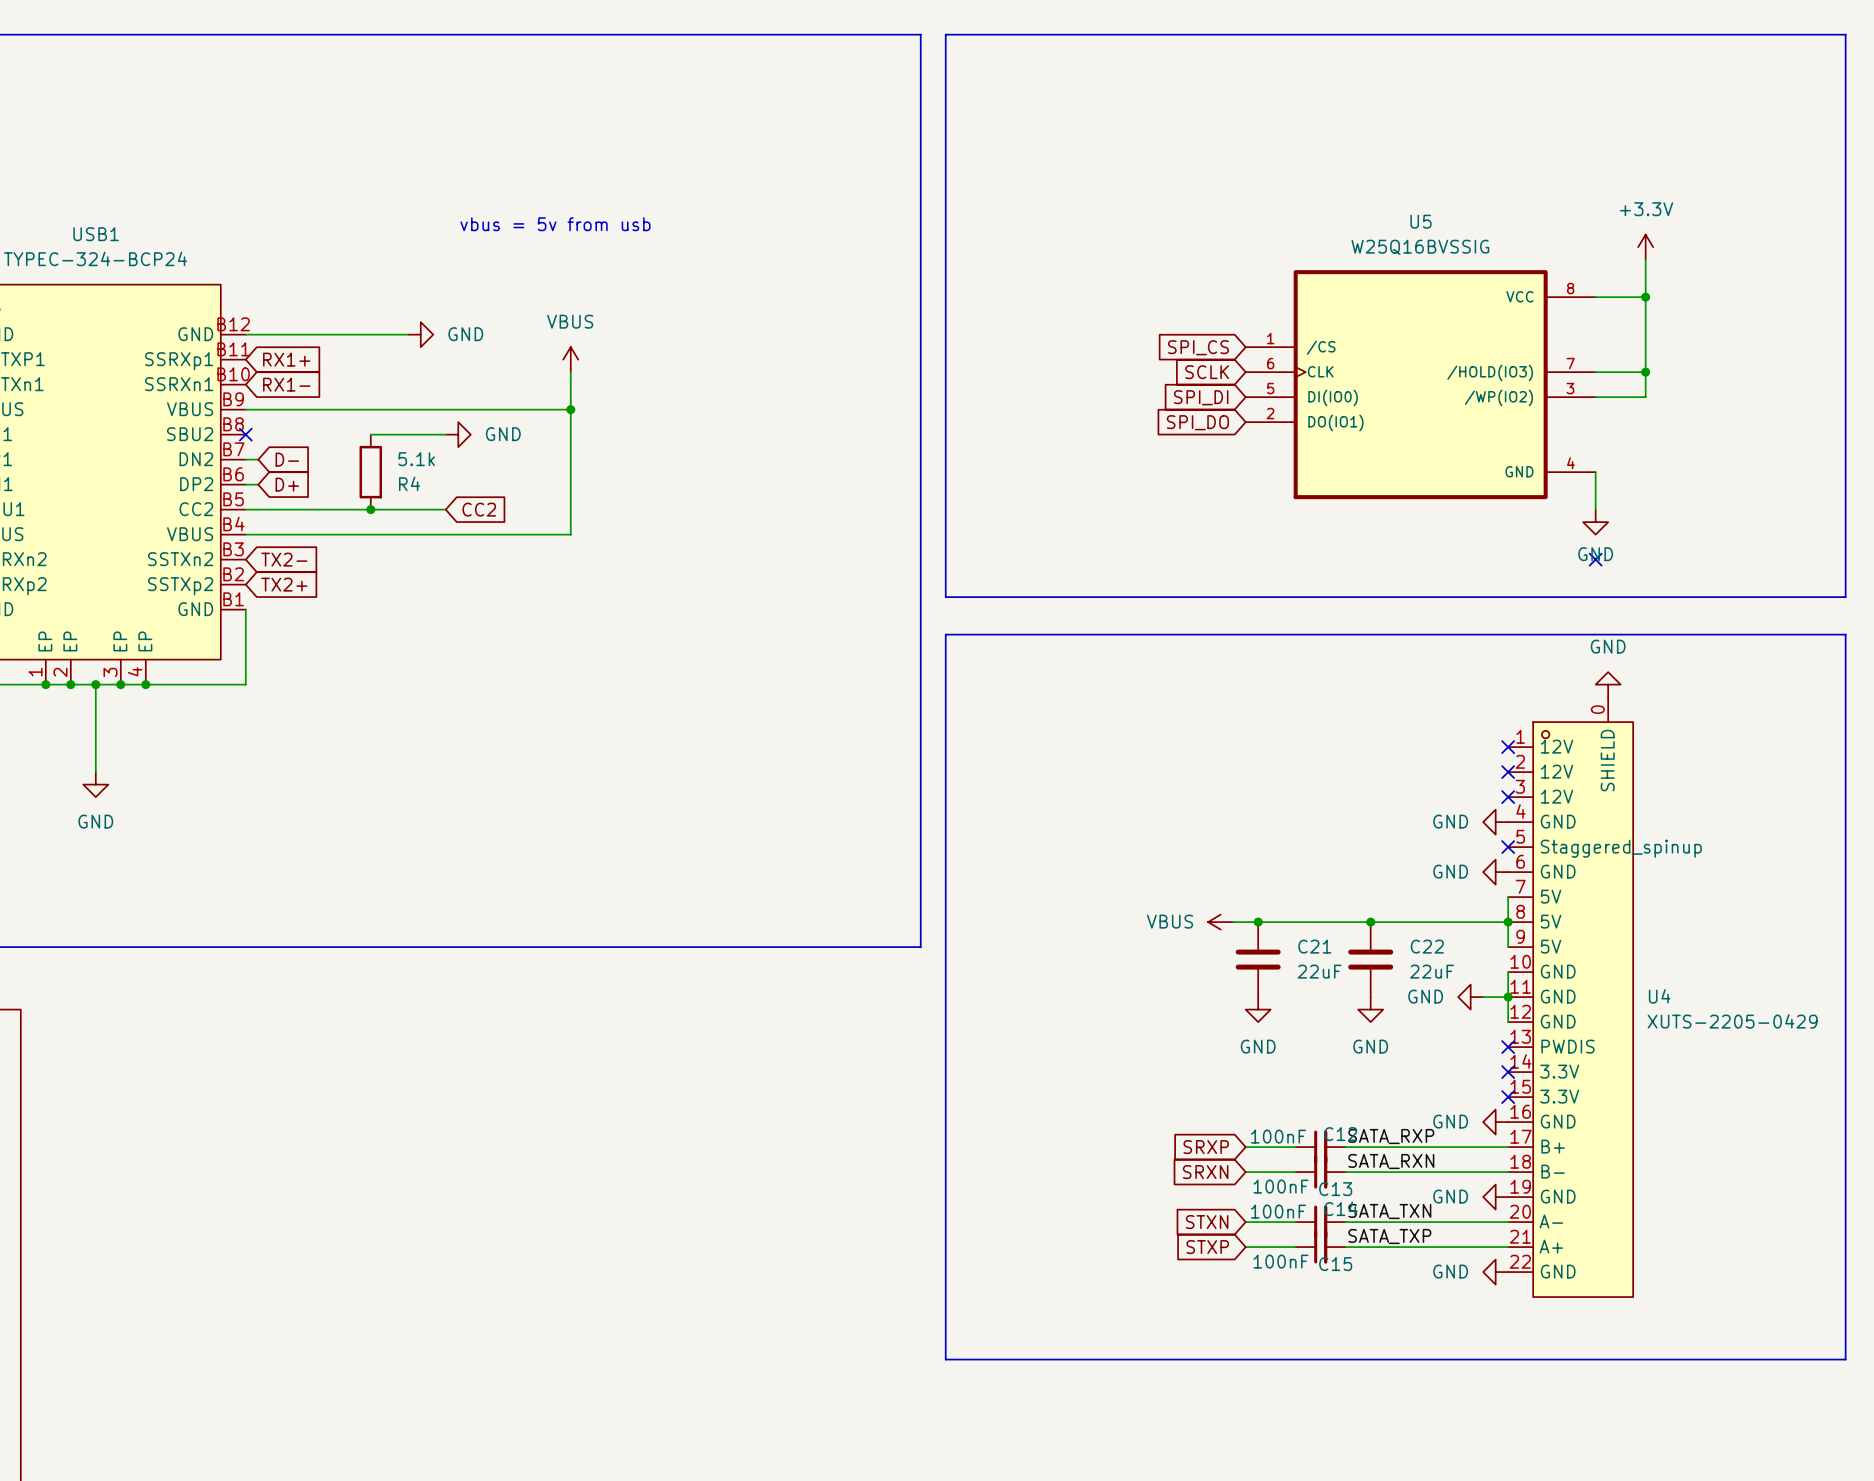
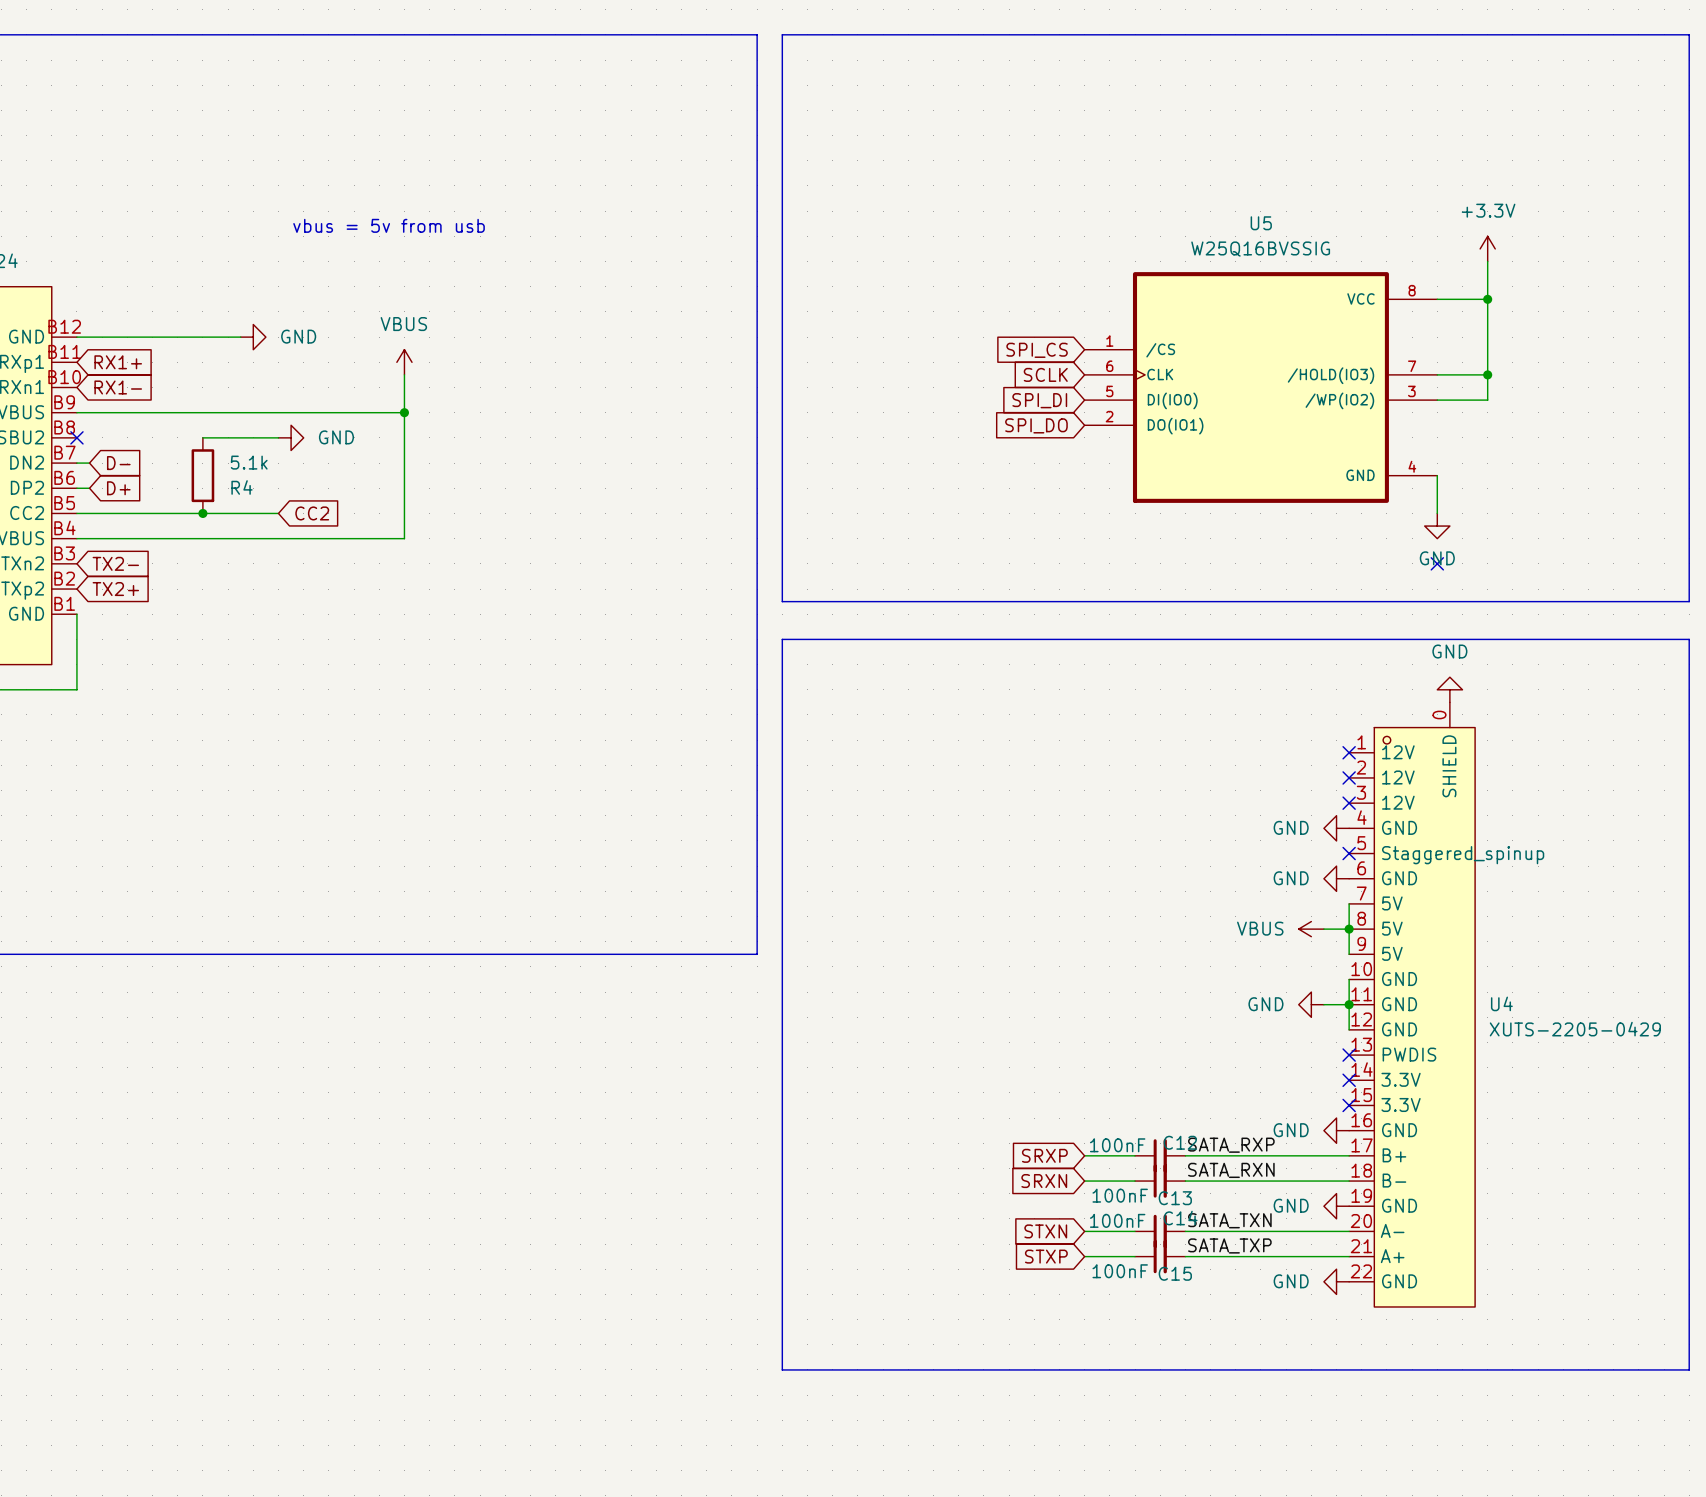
power symbol: VBUS (1220, 922) -> none
wire: (1233, 922) (1483, 922) -> none
junction: (1258, 922) -> none
junction: (1370, 922) -> none
power symbol: none -> VBUS (1311, 929)
C21: 22uF (1258, 959) -> none
C22: 22uF (1370, 959) -> none
power symbol: GND (1258, 1009) -> none
power symbol: GND (1370, 1009) -> none

